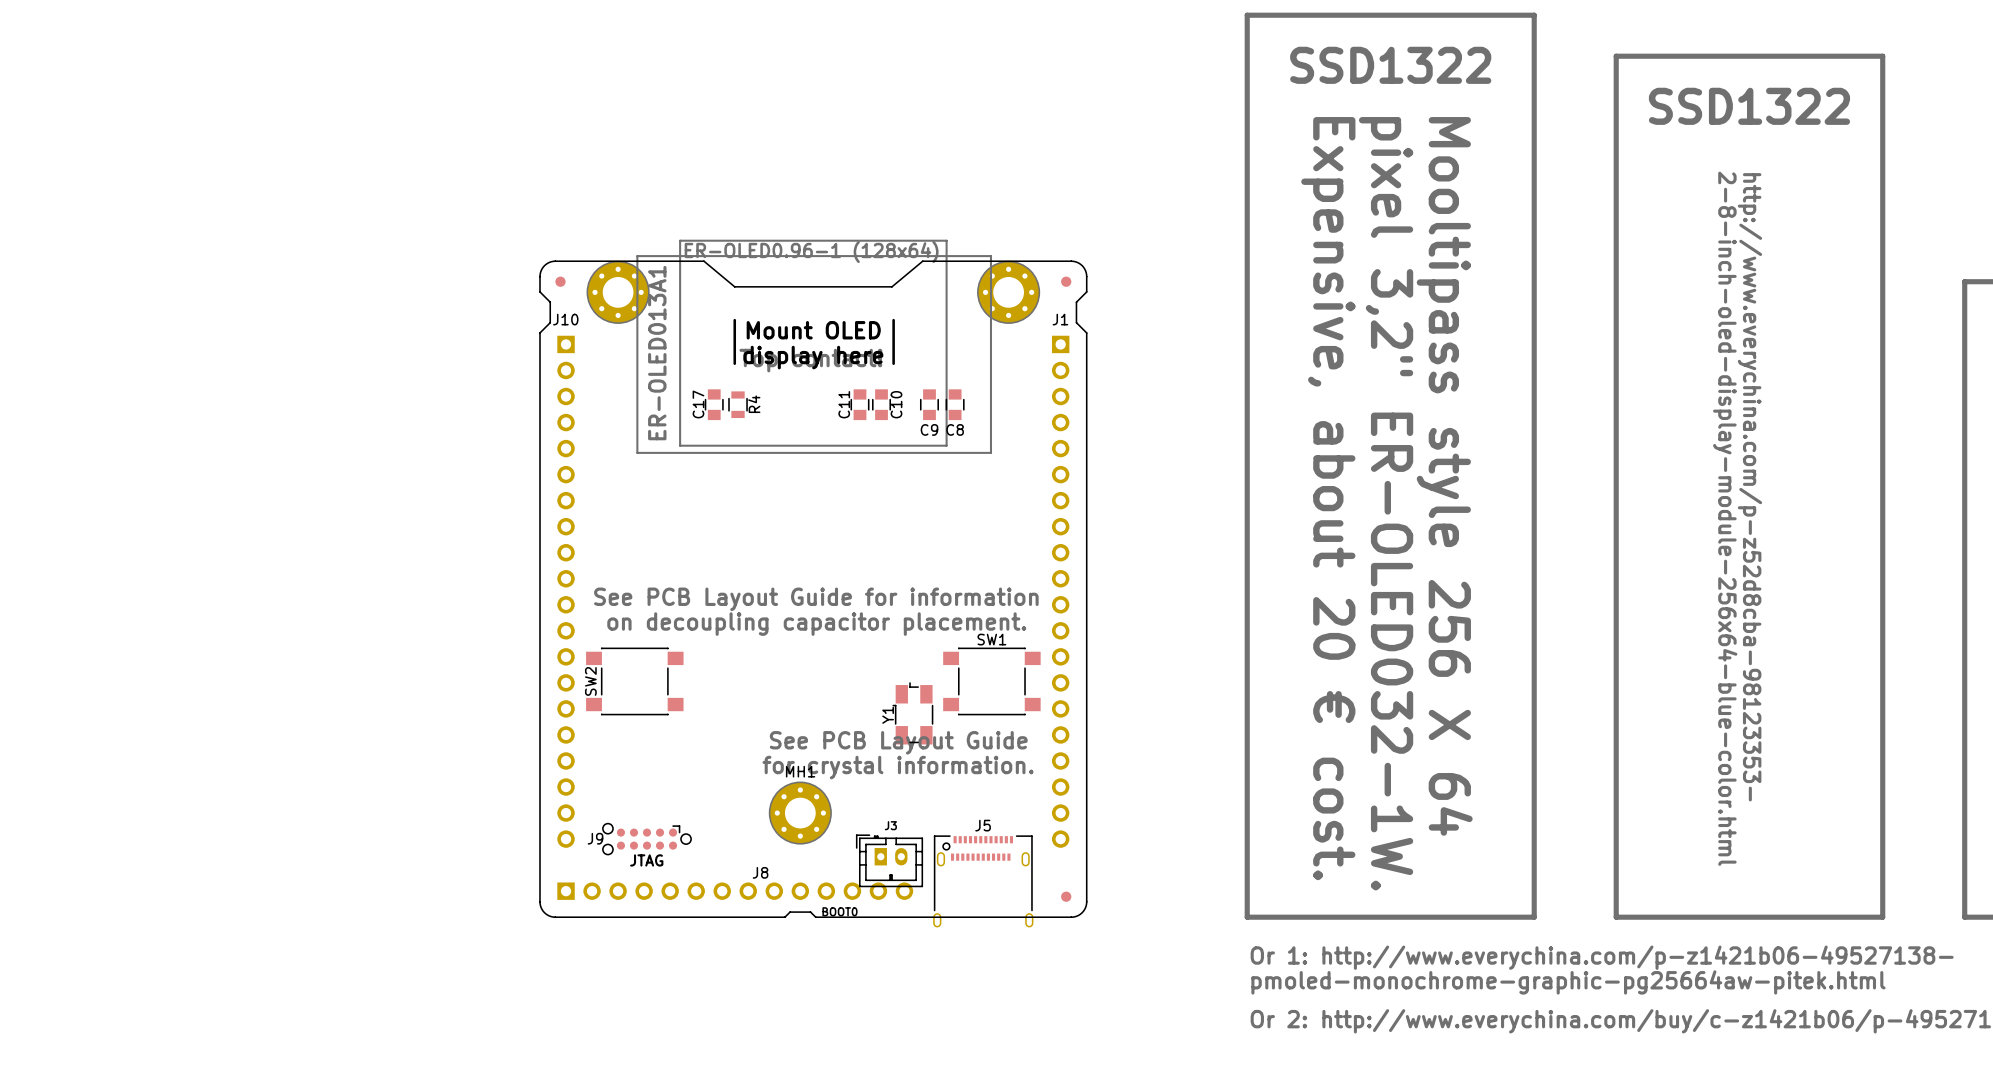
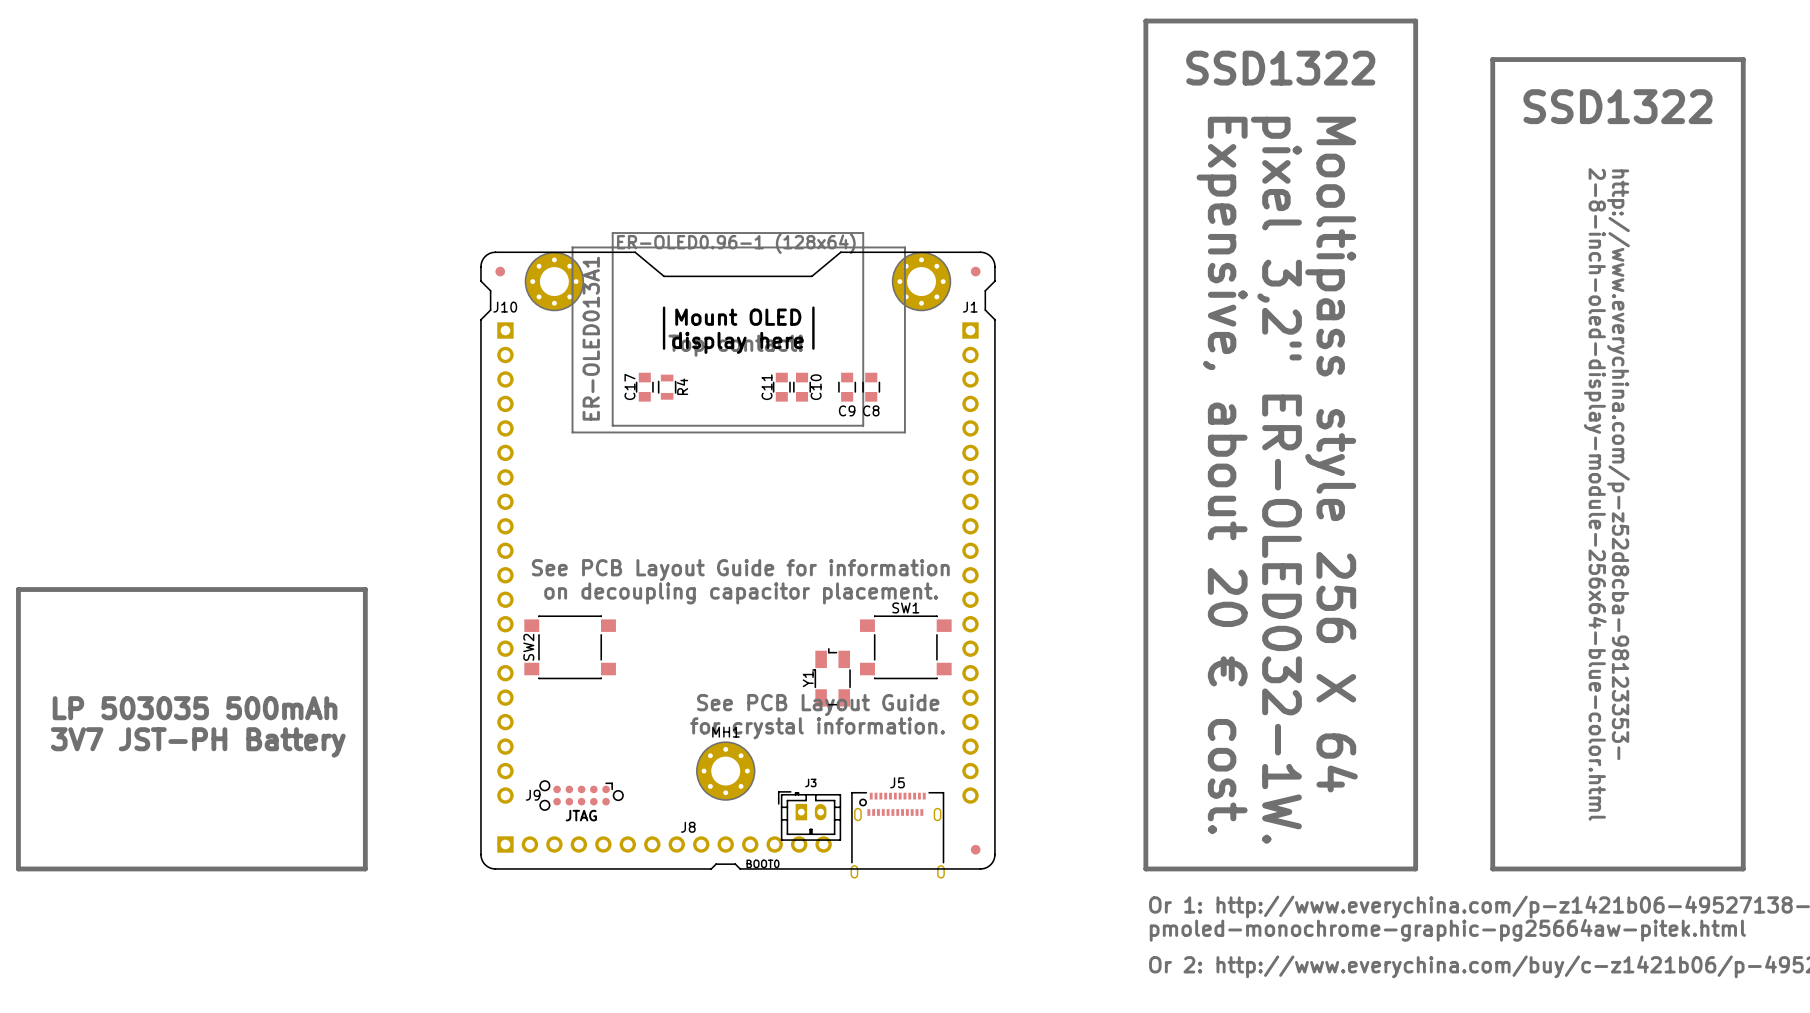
line: none -> (18, 589) (18, 868) (365, 868) (365, 589) (18, 589)
text: none -> LP 503035 500mAh (195, 708)
text: none -> 3V7 JST-PH Battery (198, 742)

